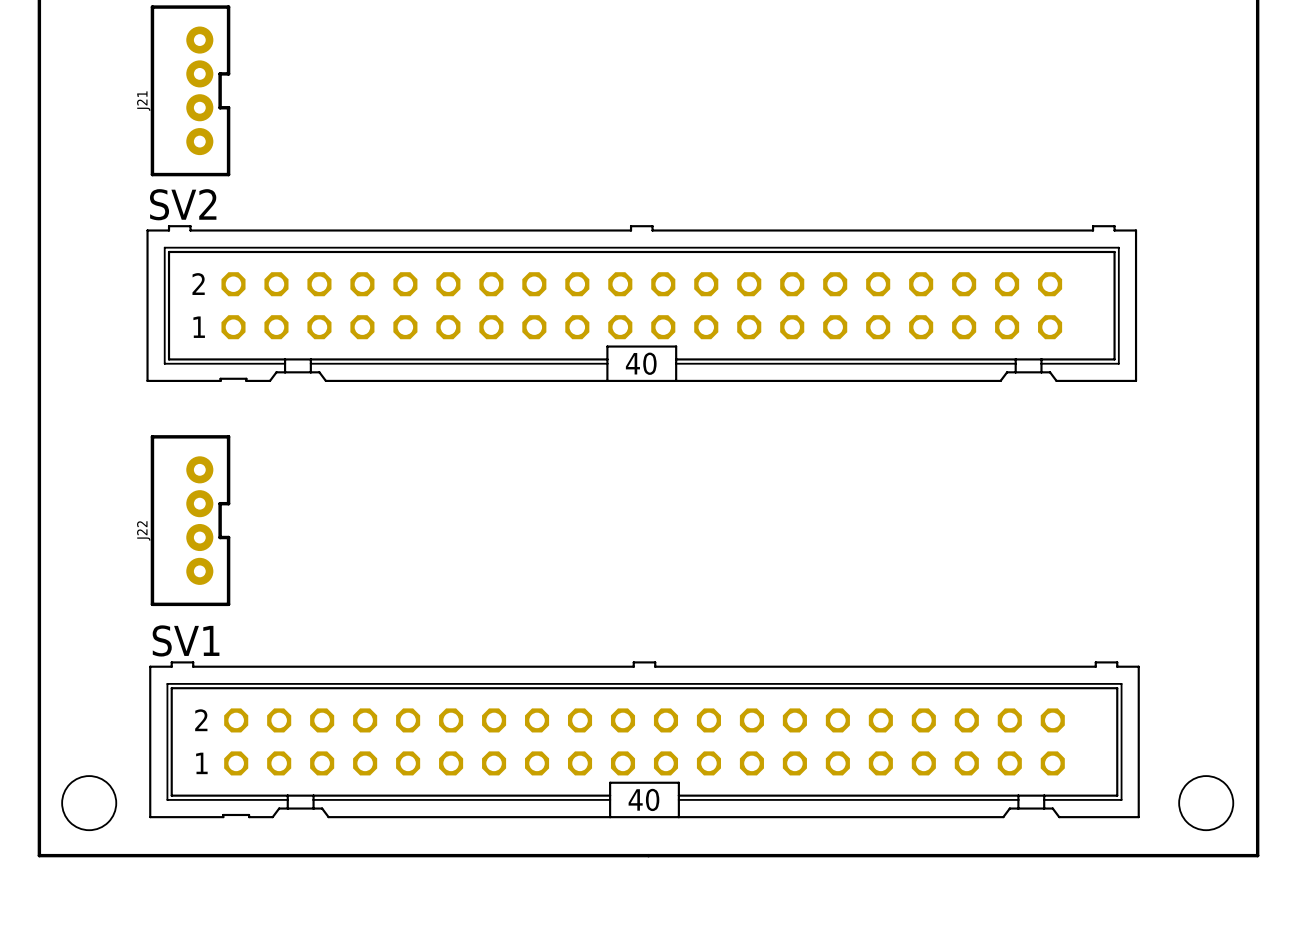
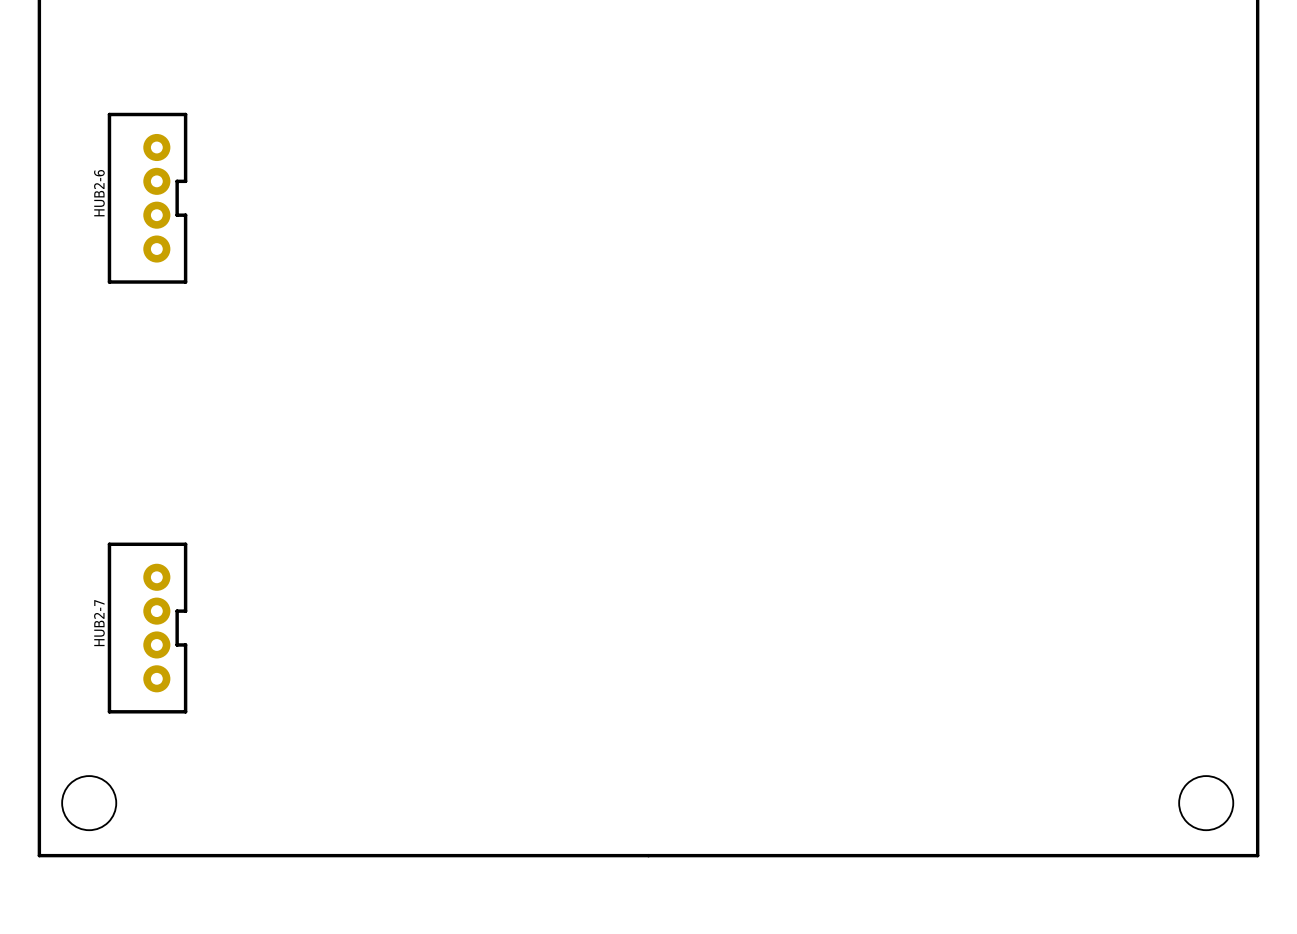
J21: (190, 90) -> none
HUB2-6: none -> (147, 198)
SV2: (641, 303) -> none
J22: (190, 520) -> none
HUB2-7: none -> (147, 628)
SV1: (644, 739) -> none

